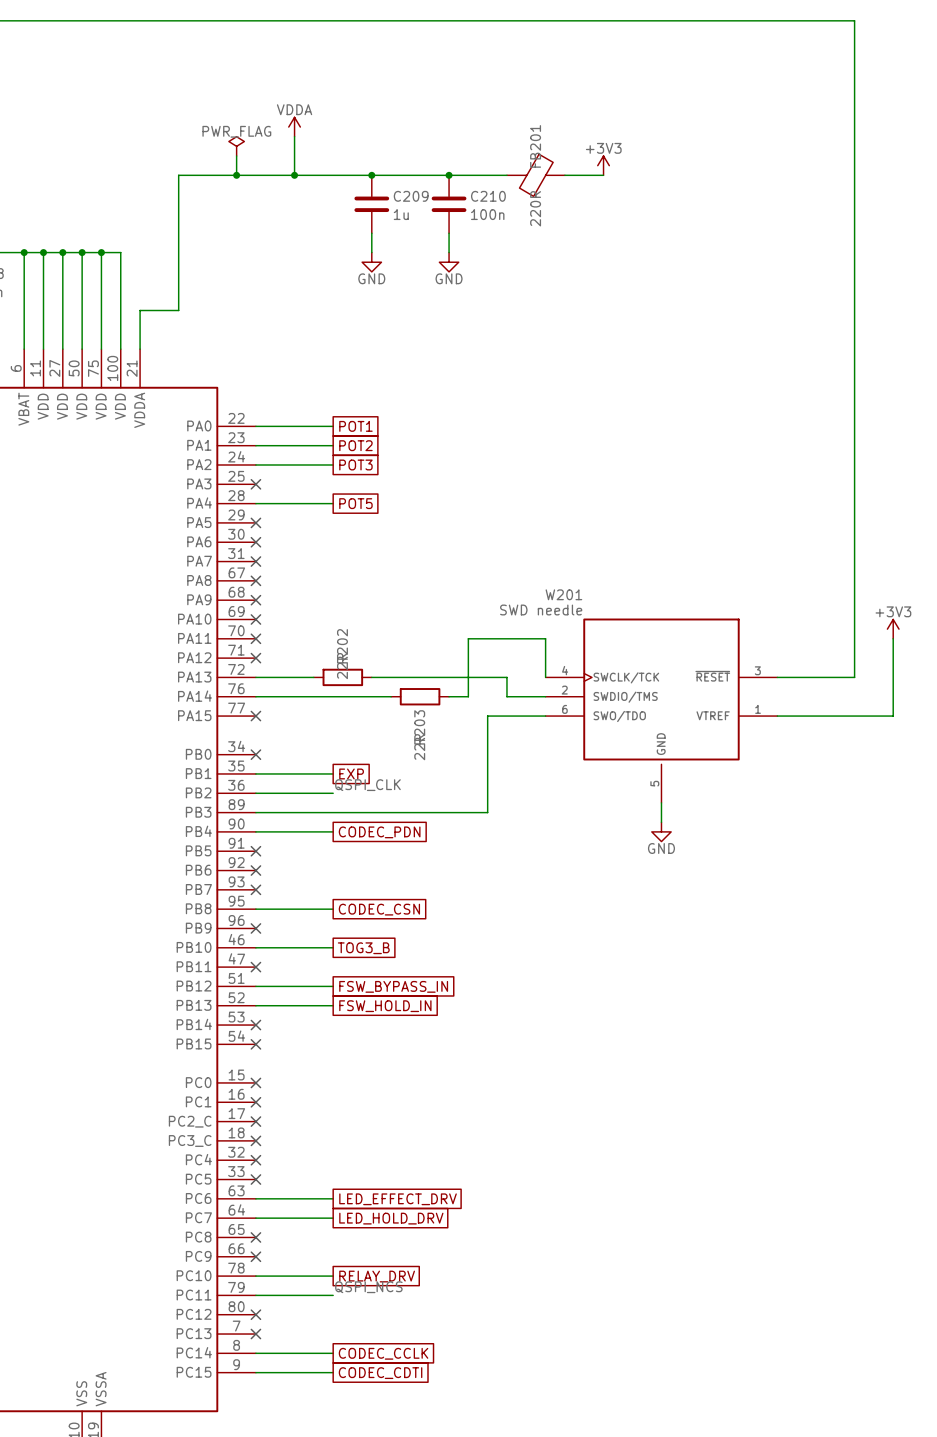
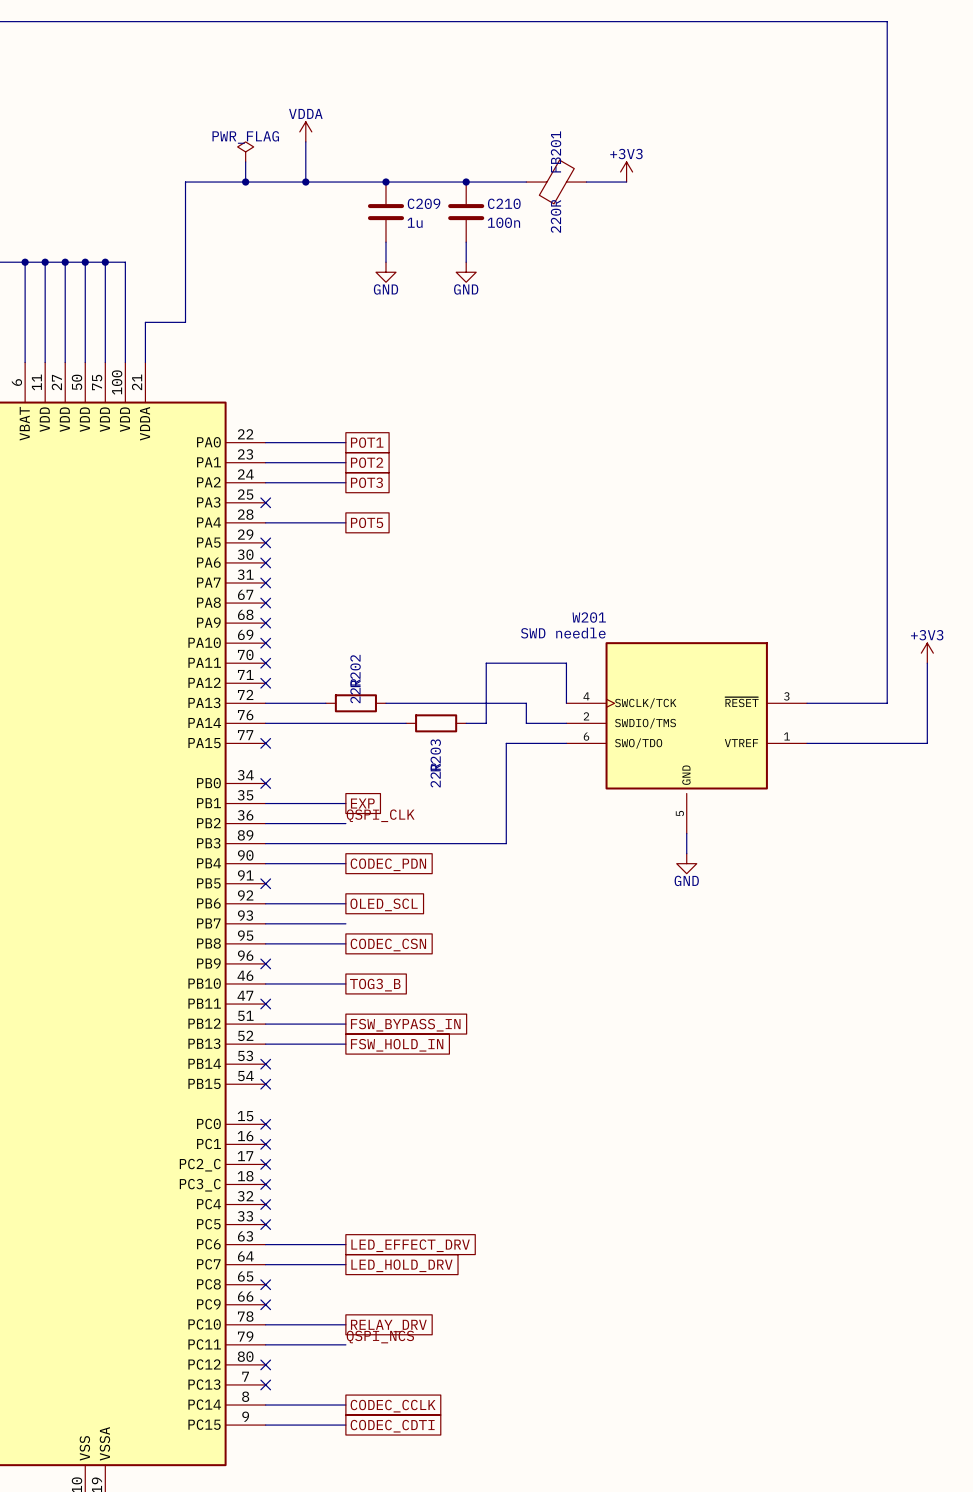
wire: none -> (265, 903) (345, 903)
no-connect mark: (255, 870) -> none
global label: none -> OLED_SCL (384, 904)
wire: none -> (265, 923) (345, 923)
no-connect mark: (255, 889) -> none

